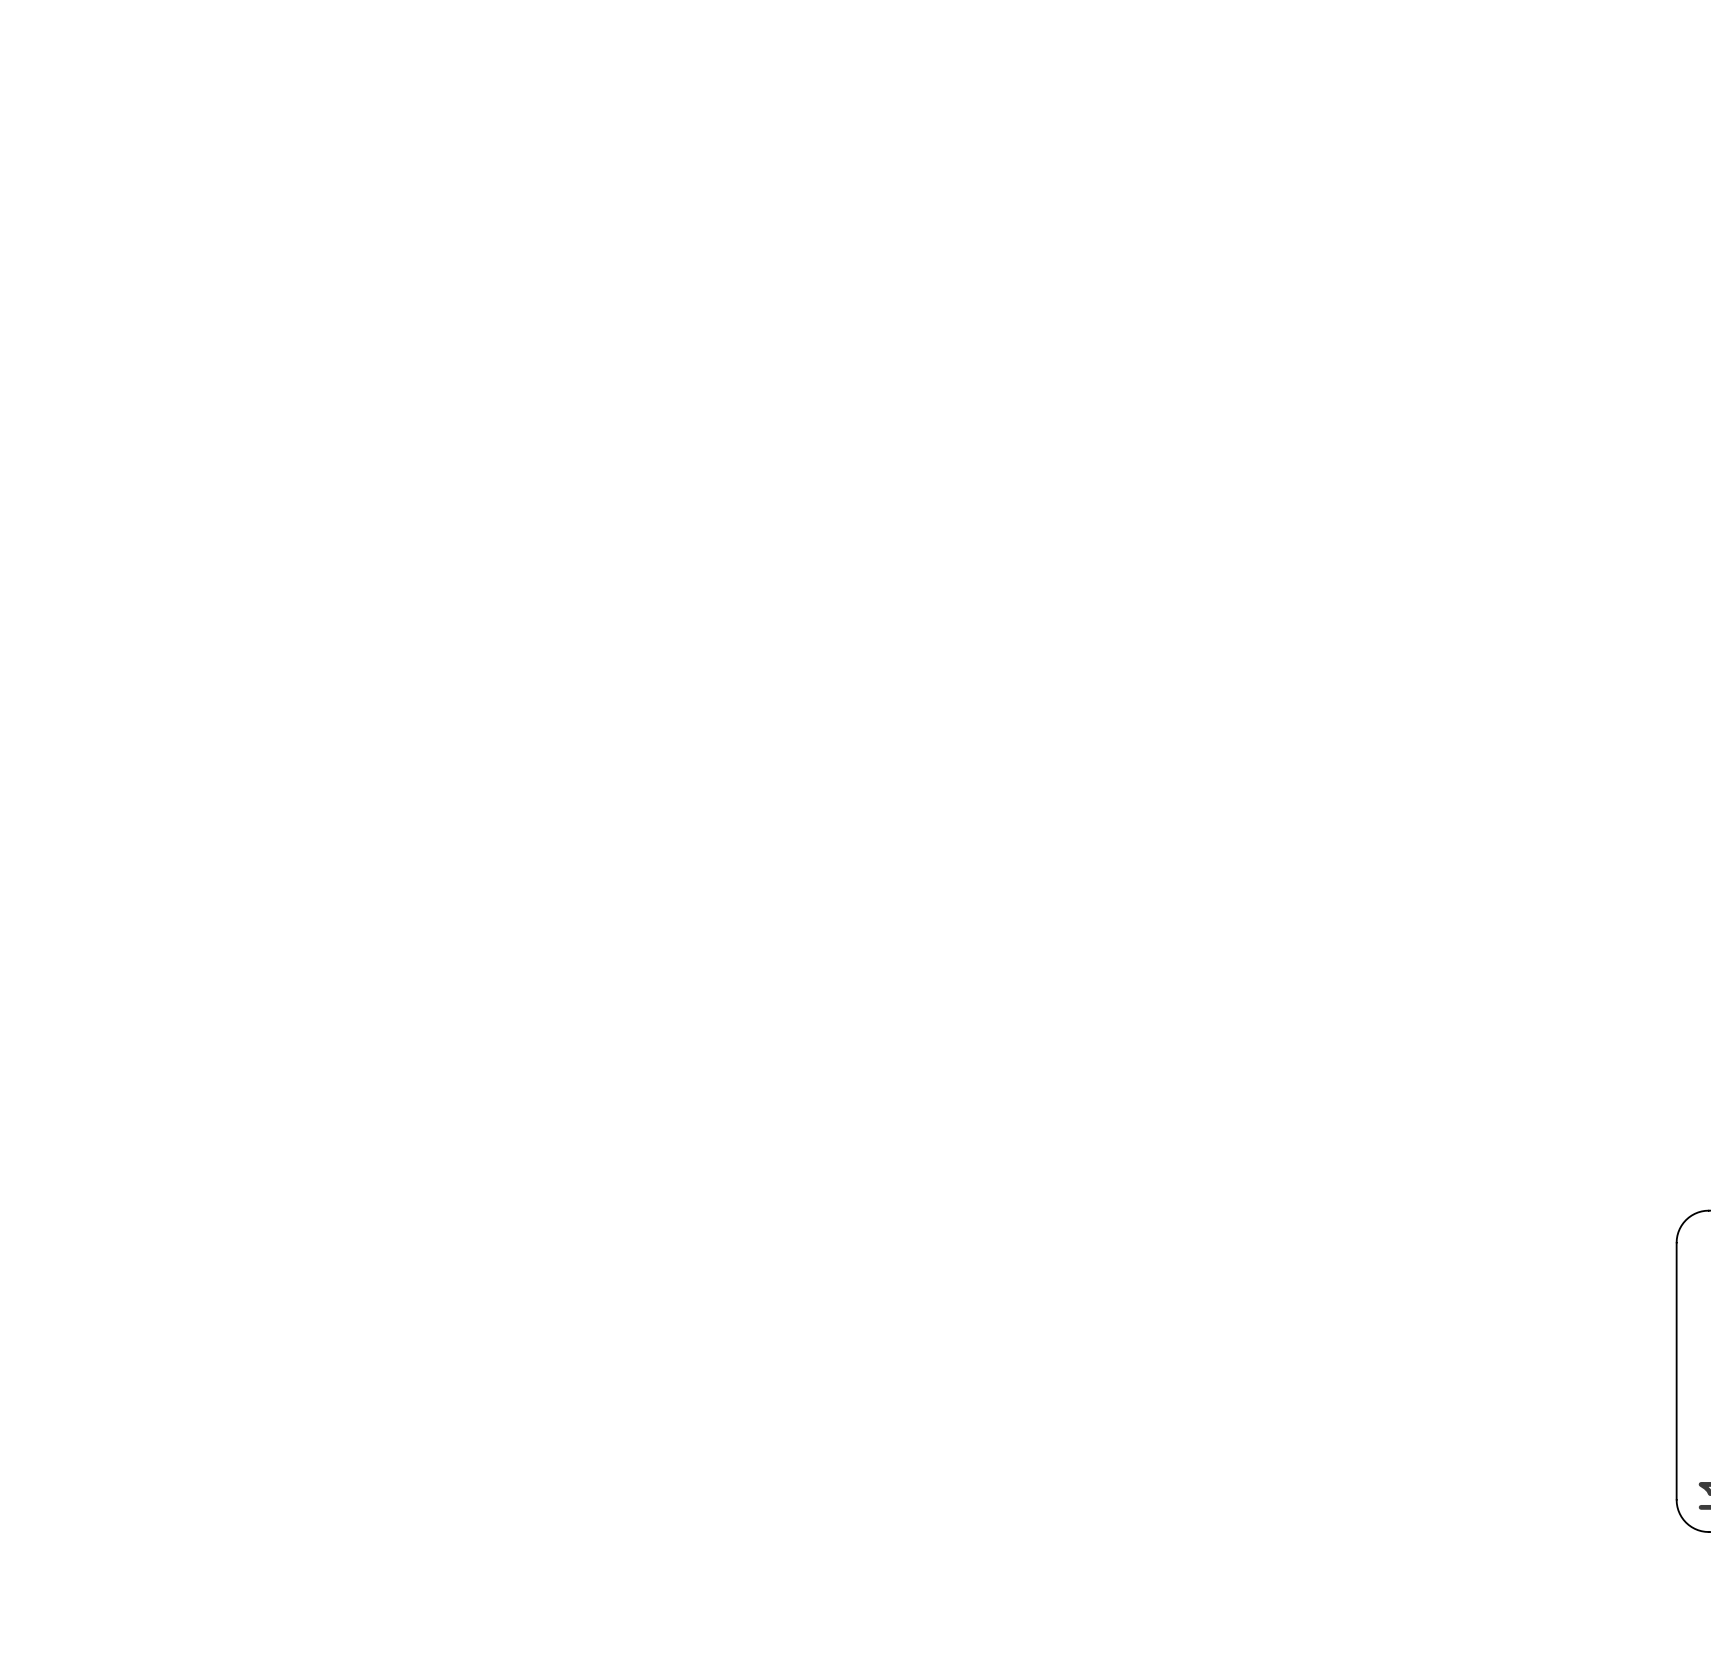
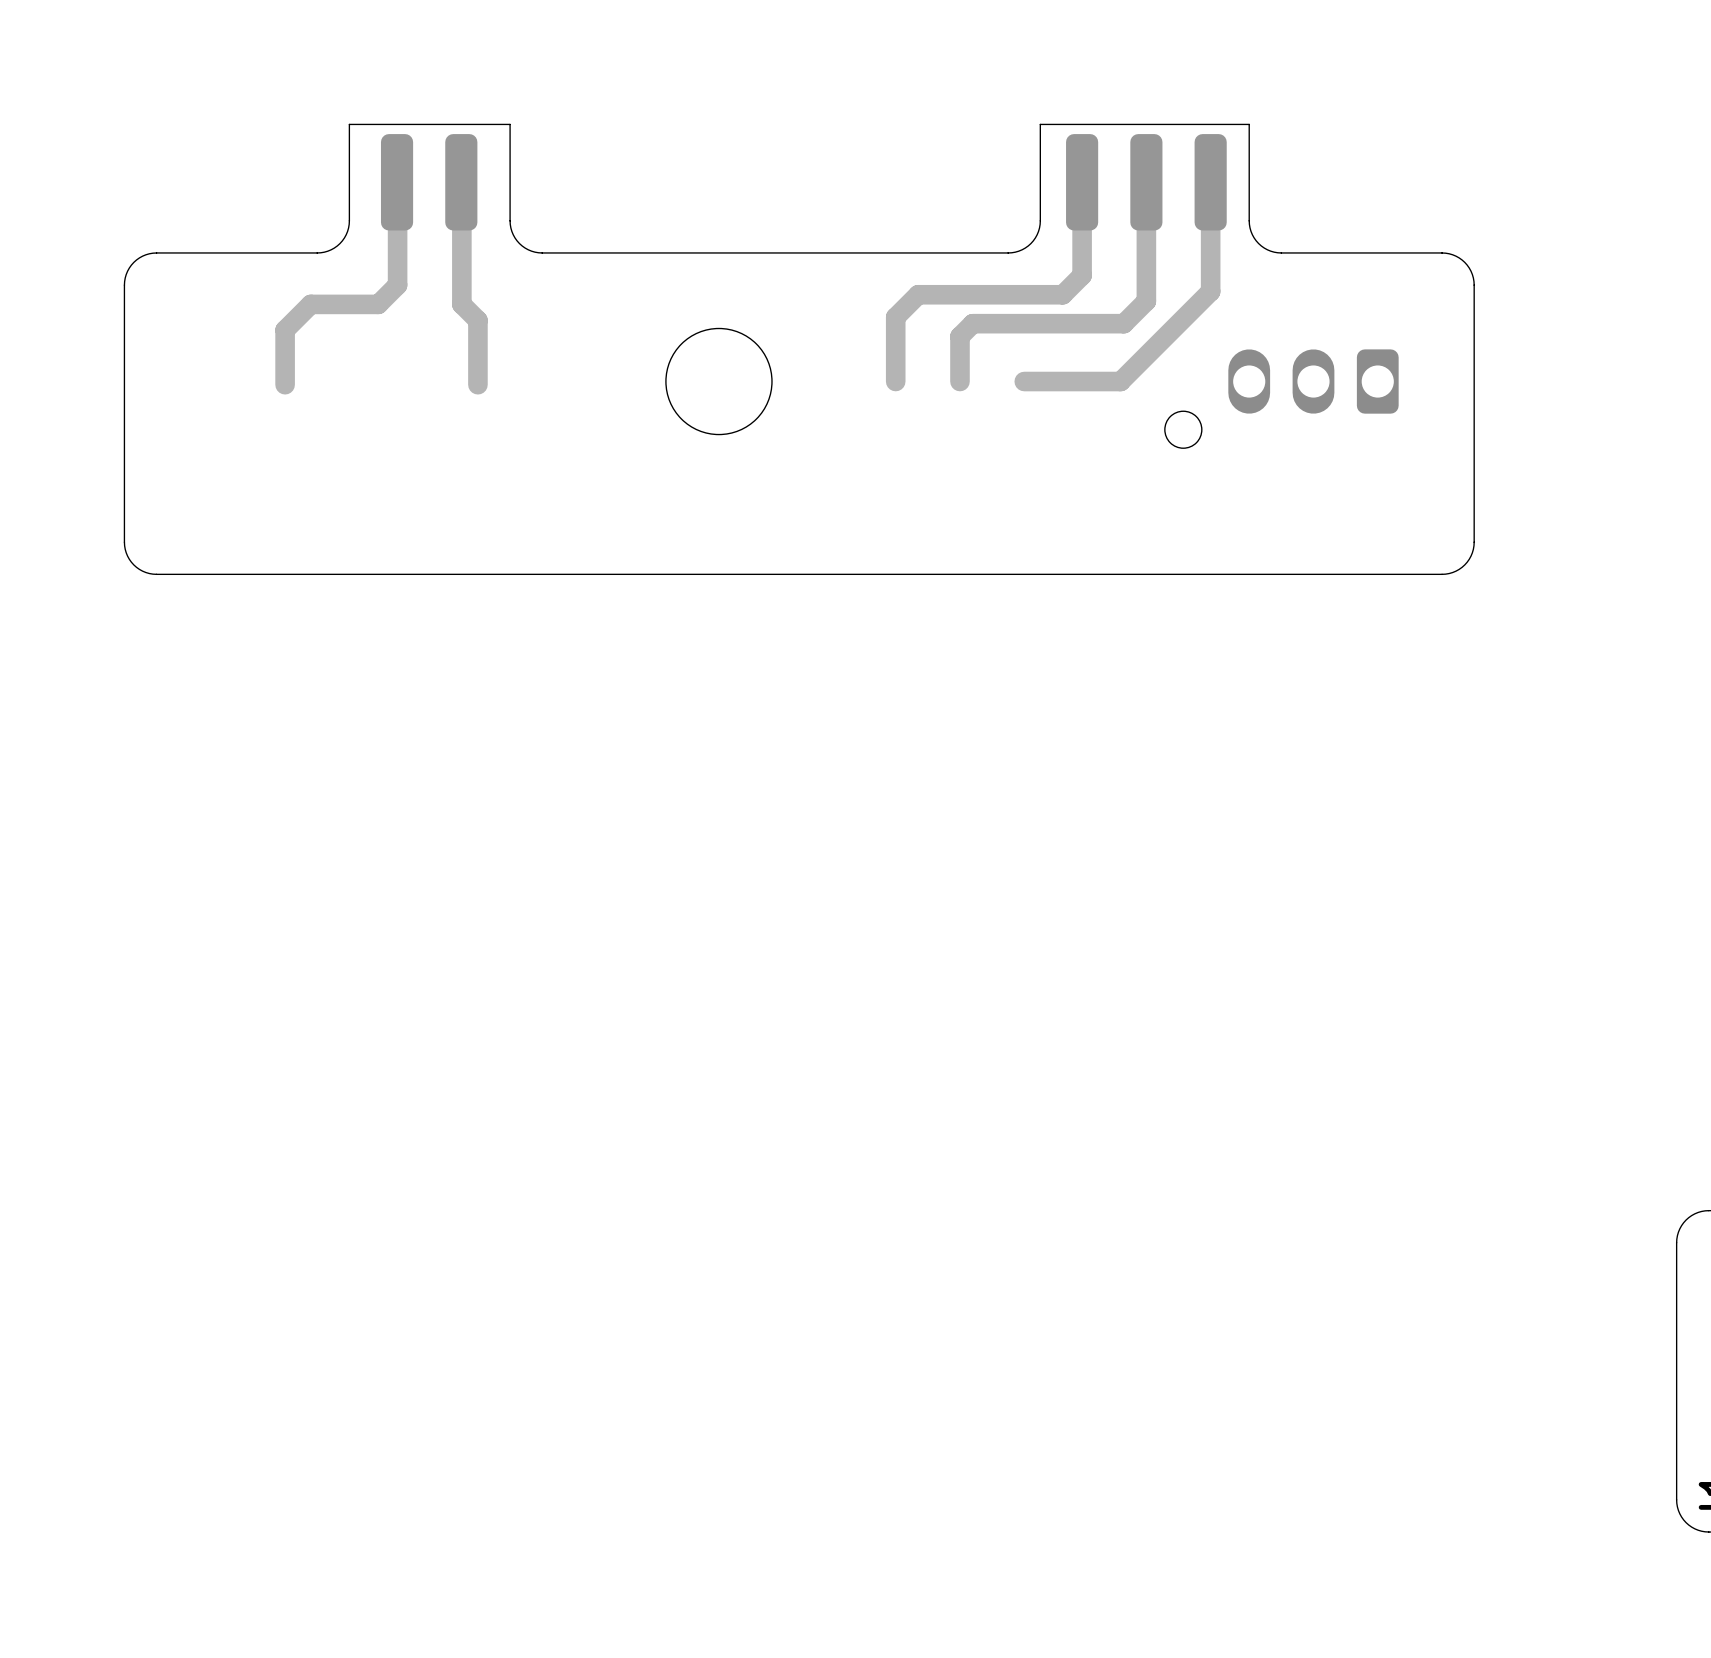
board edge: none -> (349, 124) (510, 124) (510, 227) (514, 237) (522, 245) (531, 251) (542, 252) (1015, 252) (1030, 243) (1039, 227) (1040, 124) (1249, 124) (1249, 224) (1254, 237) (1264, 248) (1281, 252) (1445, 253) (1462, 259) (1470, 271) (1474, 285) (1474, 542) (1472, 552) (1462, 567) (1452, 572) (1442, 574) (156, 574) (142, 571) (129, 559) (124, 542) (124, 285) (127, 271) (139, 257) (152, 253) (317, 252) (334, 248) (344, 237) (349, 224) (349, 124)
part: none -> (429, 182)
part: none -> (1146, 182)
track: none -> (397, 211) (397, 285) (378, 304) (310, 304) (285, 330) (285, 384)
track: none -> (461, 211) (461, 304) (477, 320) (477, 384)
track: none -> (1082, 211) (1082, 275) (1062, 294) (918, 294) (895, 317) (895, 381)
track: none -> (1146, 211) (1146, 301) (1123, 323) (972, 323) (959, 336) (959, 381)
track: none -> (1210, 211) (1210, 291) (1120, 381) (1024, 381)
round board edge: none -> [665, 328, 773, 435]
part: none -> (1281, 398)

